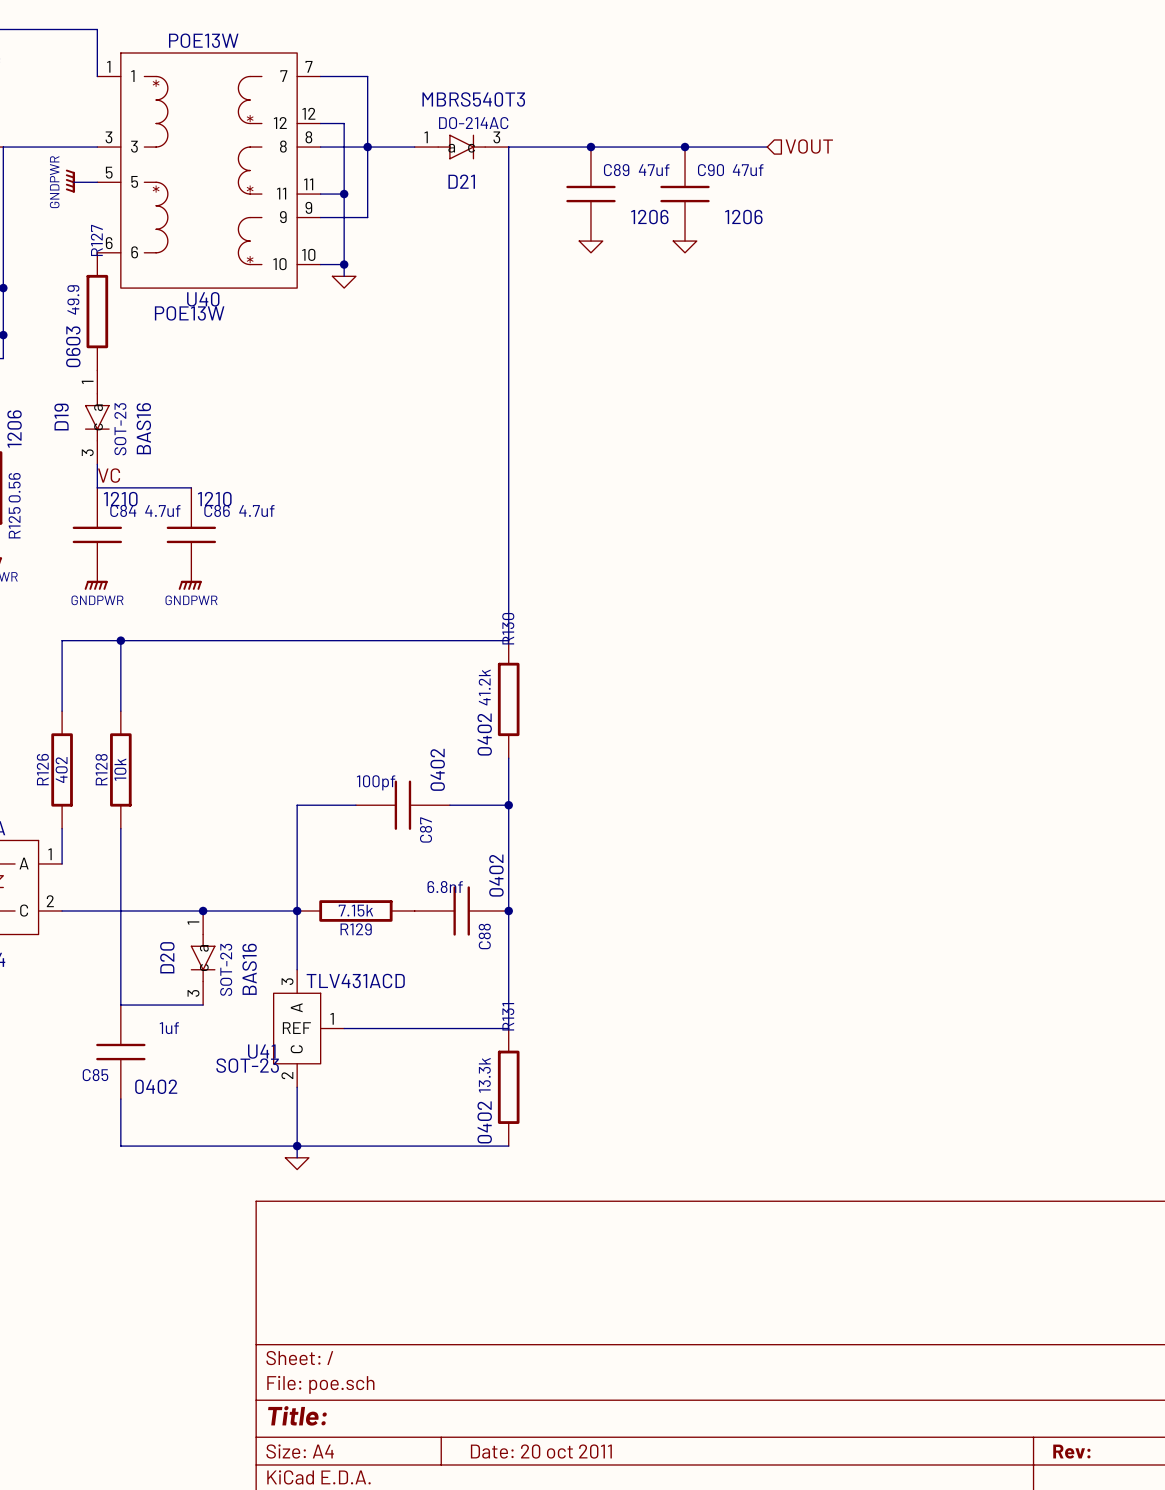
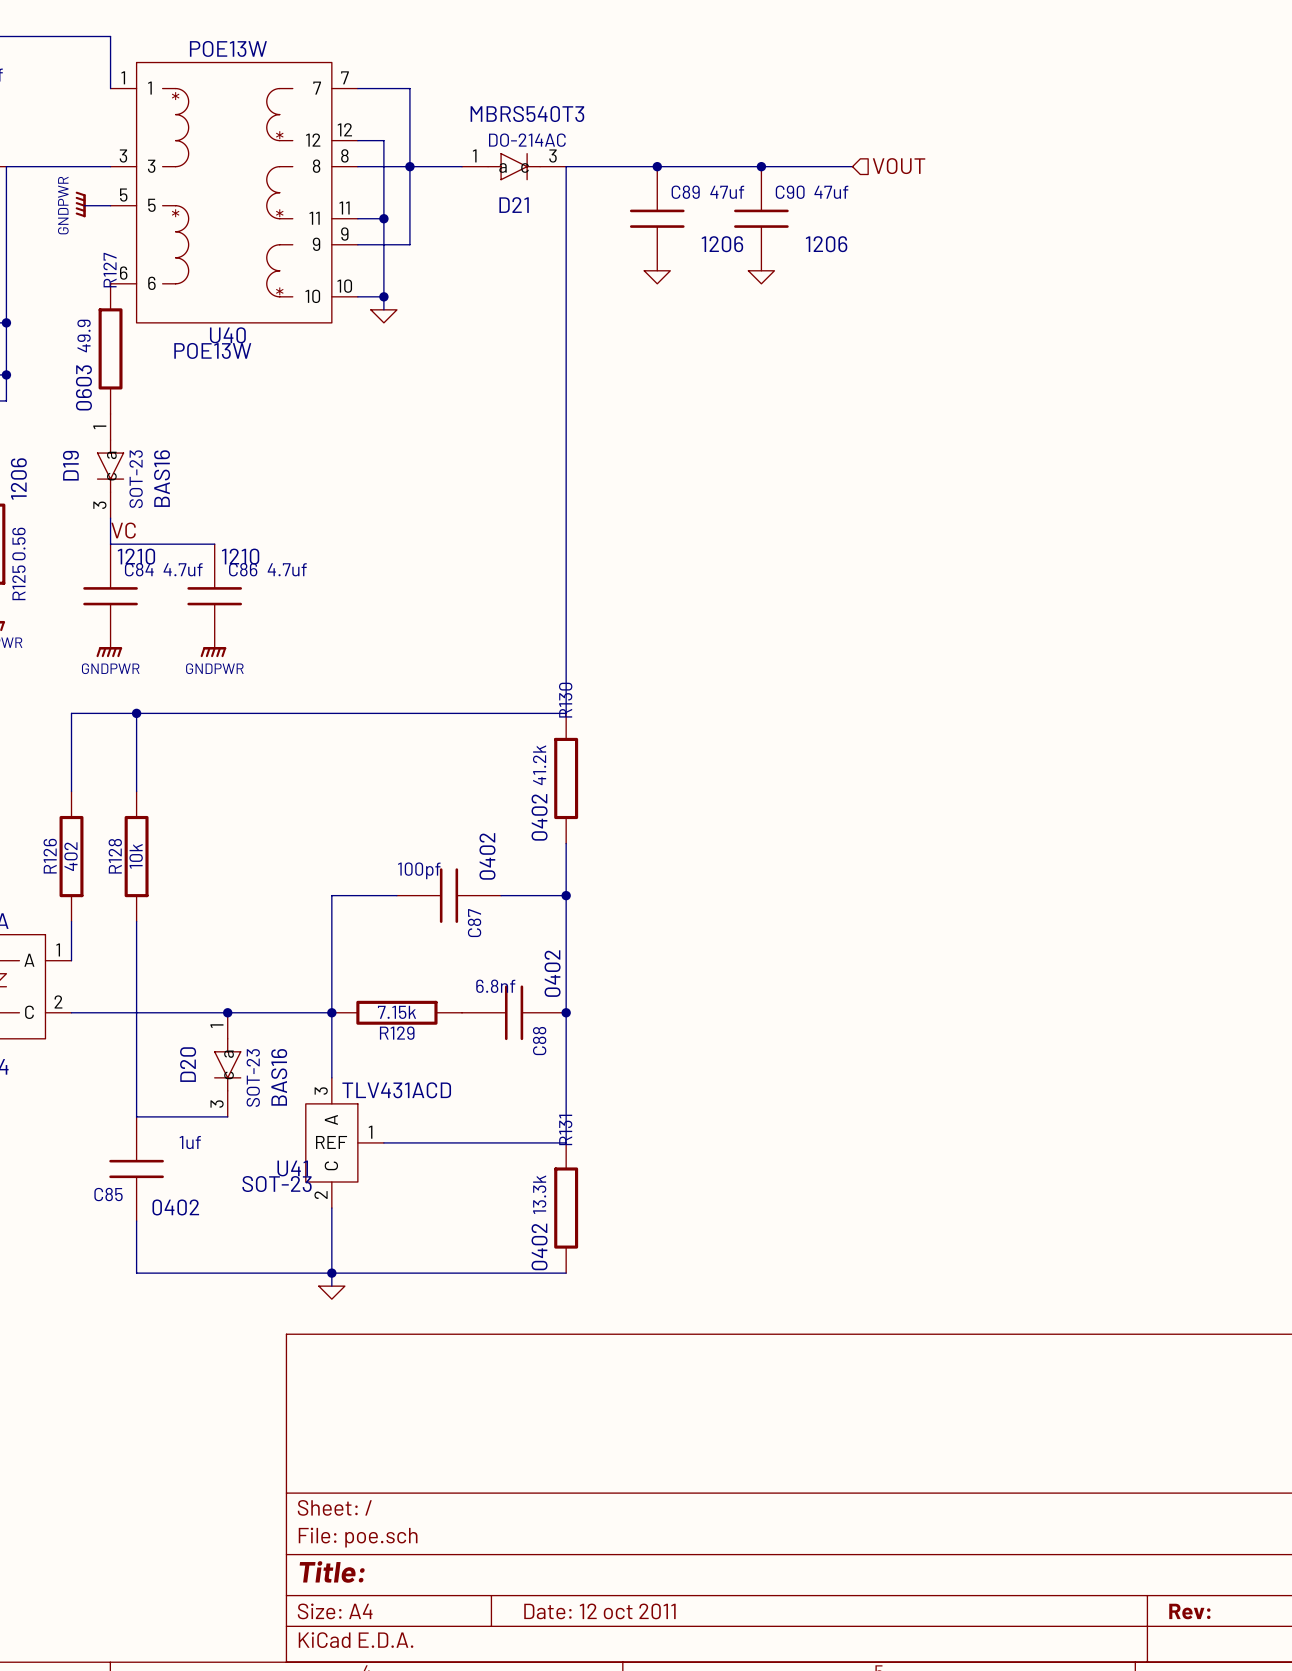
title block: Date: 20 oct 2011 (541, 1451) -> Date: 12 oct 2011 (599, 1611)

